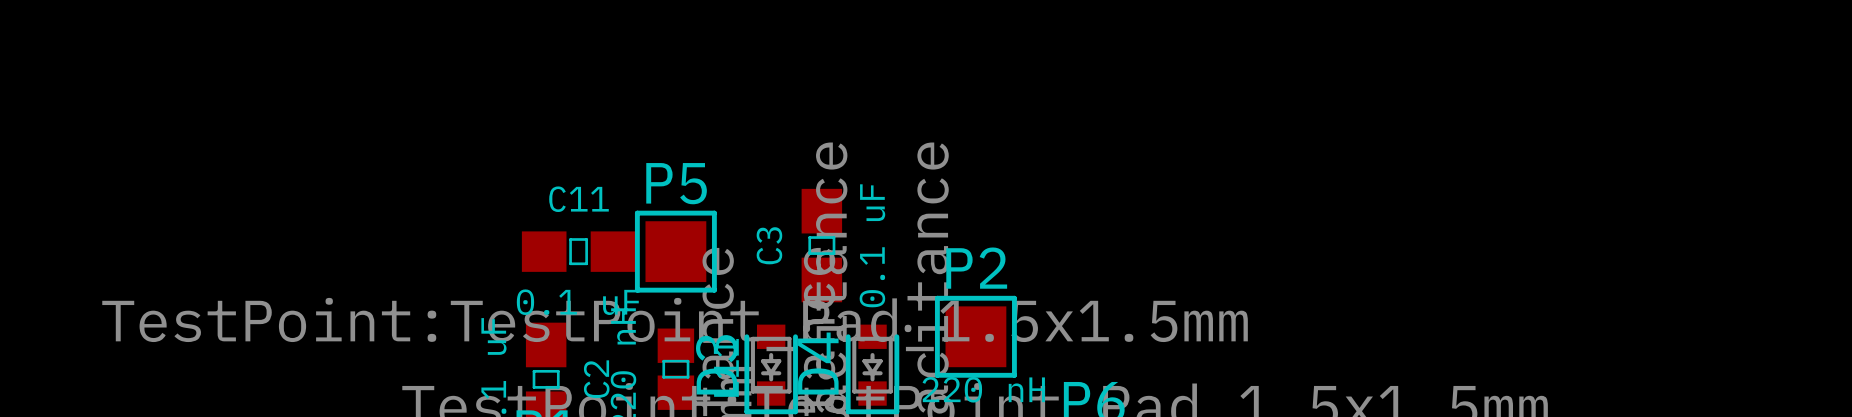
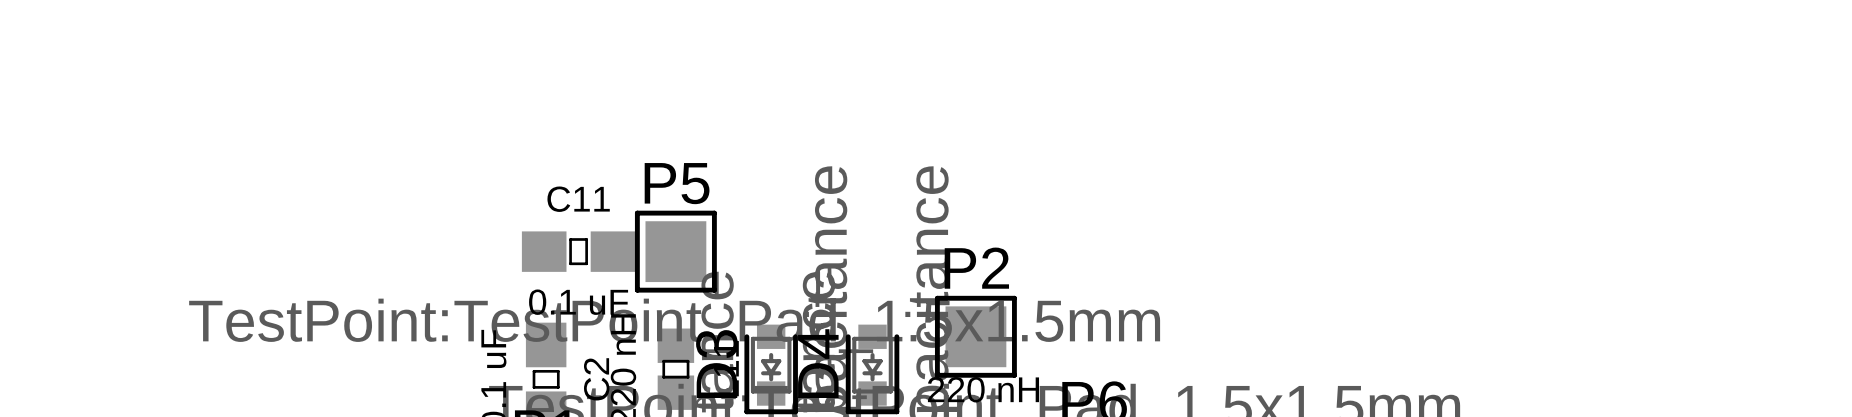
C3: 0.1 uF (821, 245) -> none

